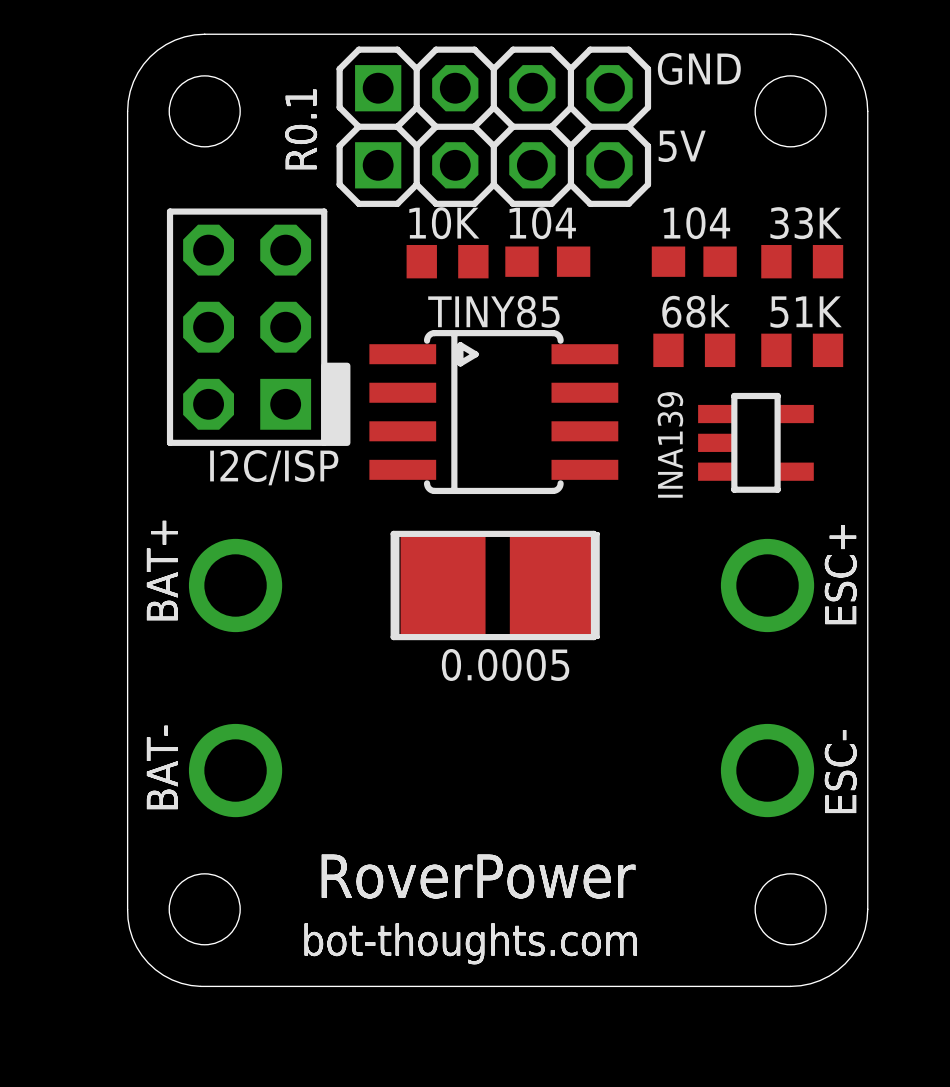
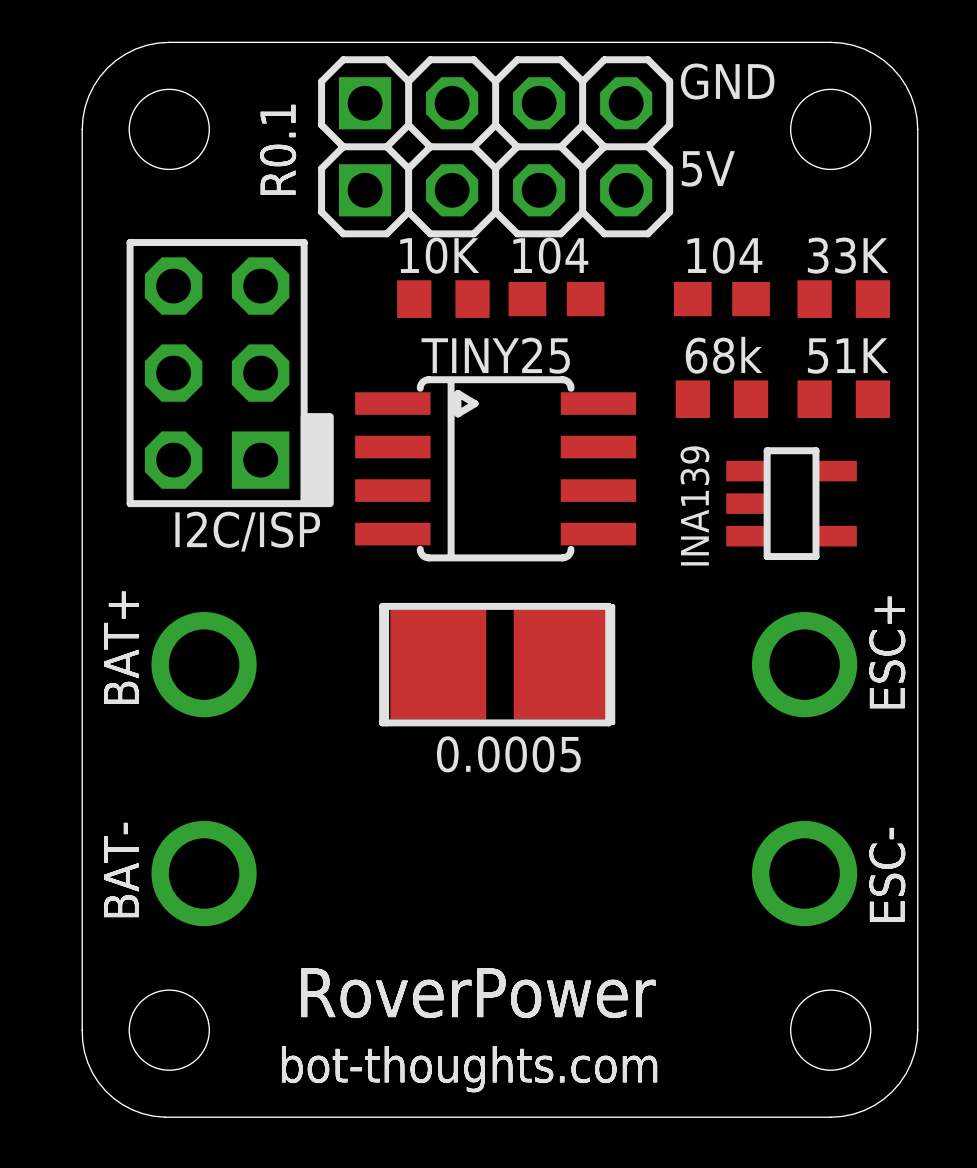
text: TINY85 (493, 311) -> TINY25 (495, 355)

